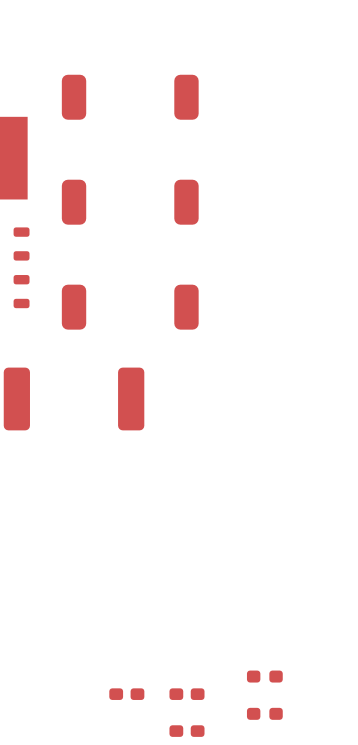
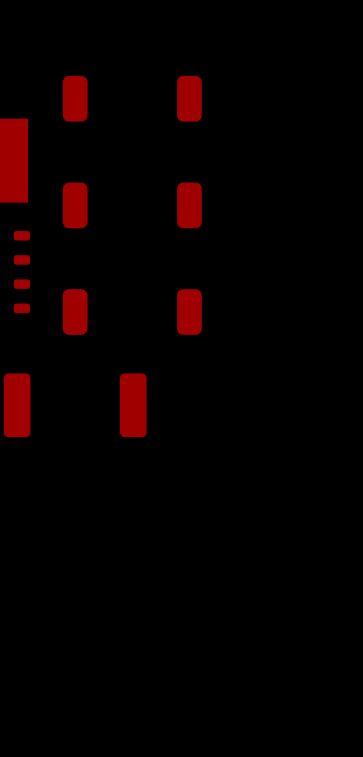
part: (264, 676) -> none
part: (126, 694) -> none
part: (186, 694) -> none
part: (264, 713) -> none
part: (186, 731) -> none

